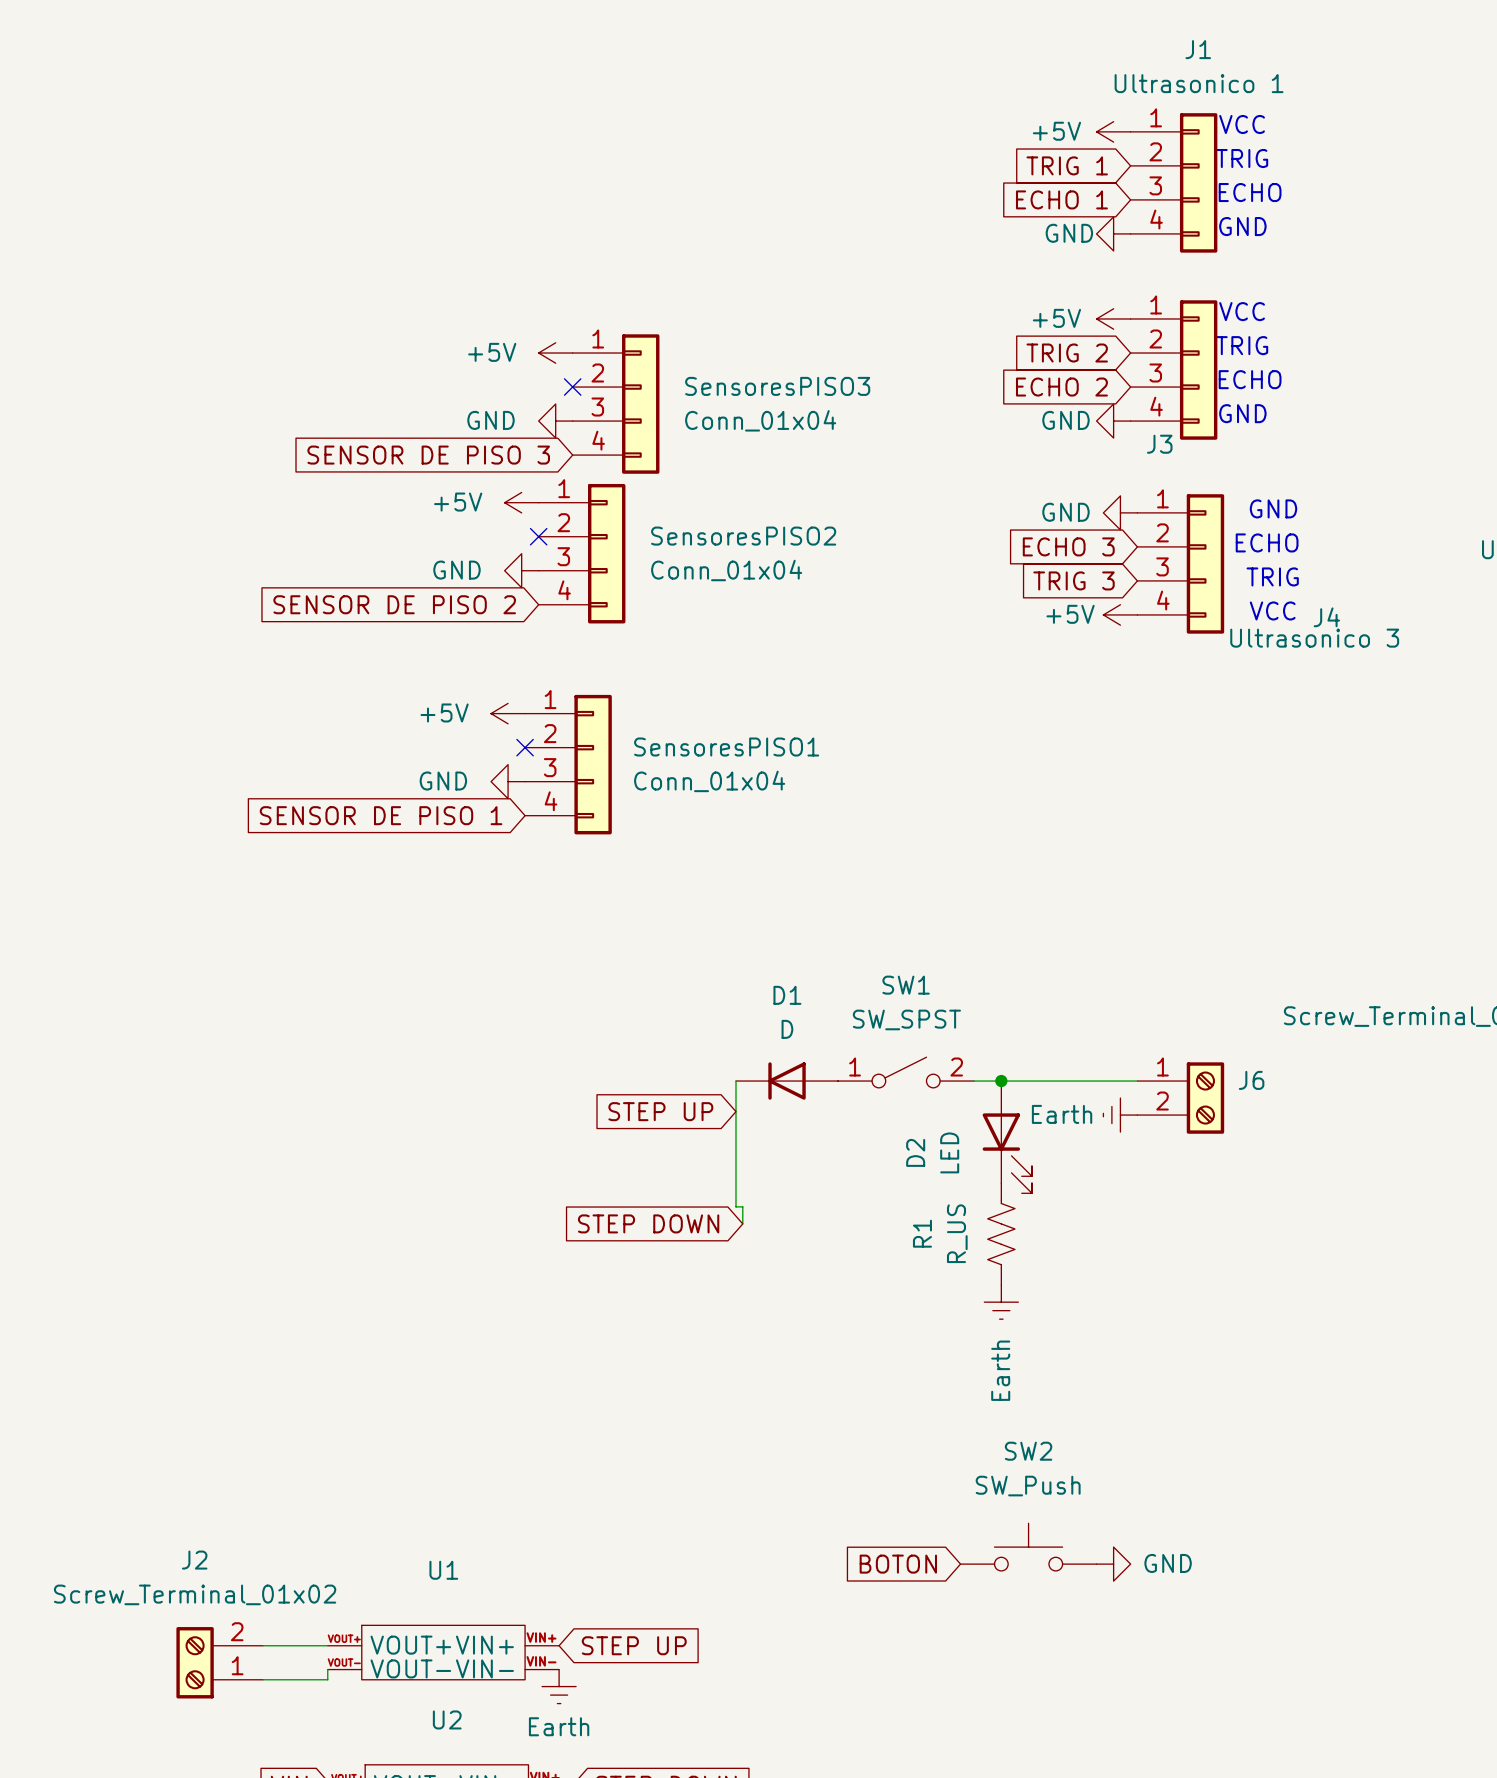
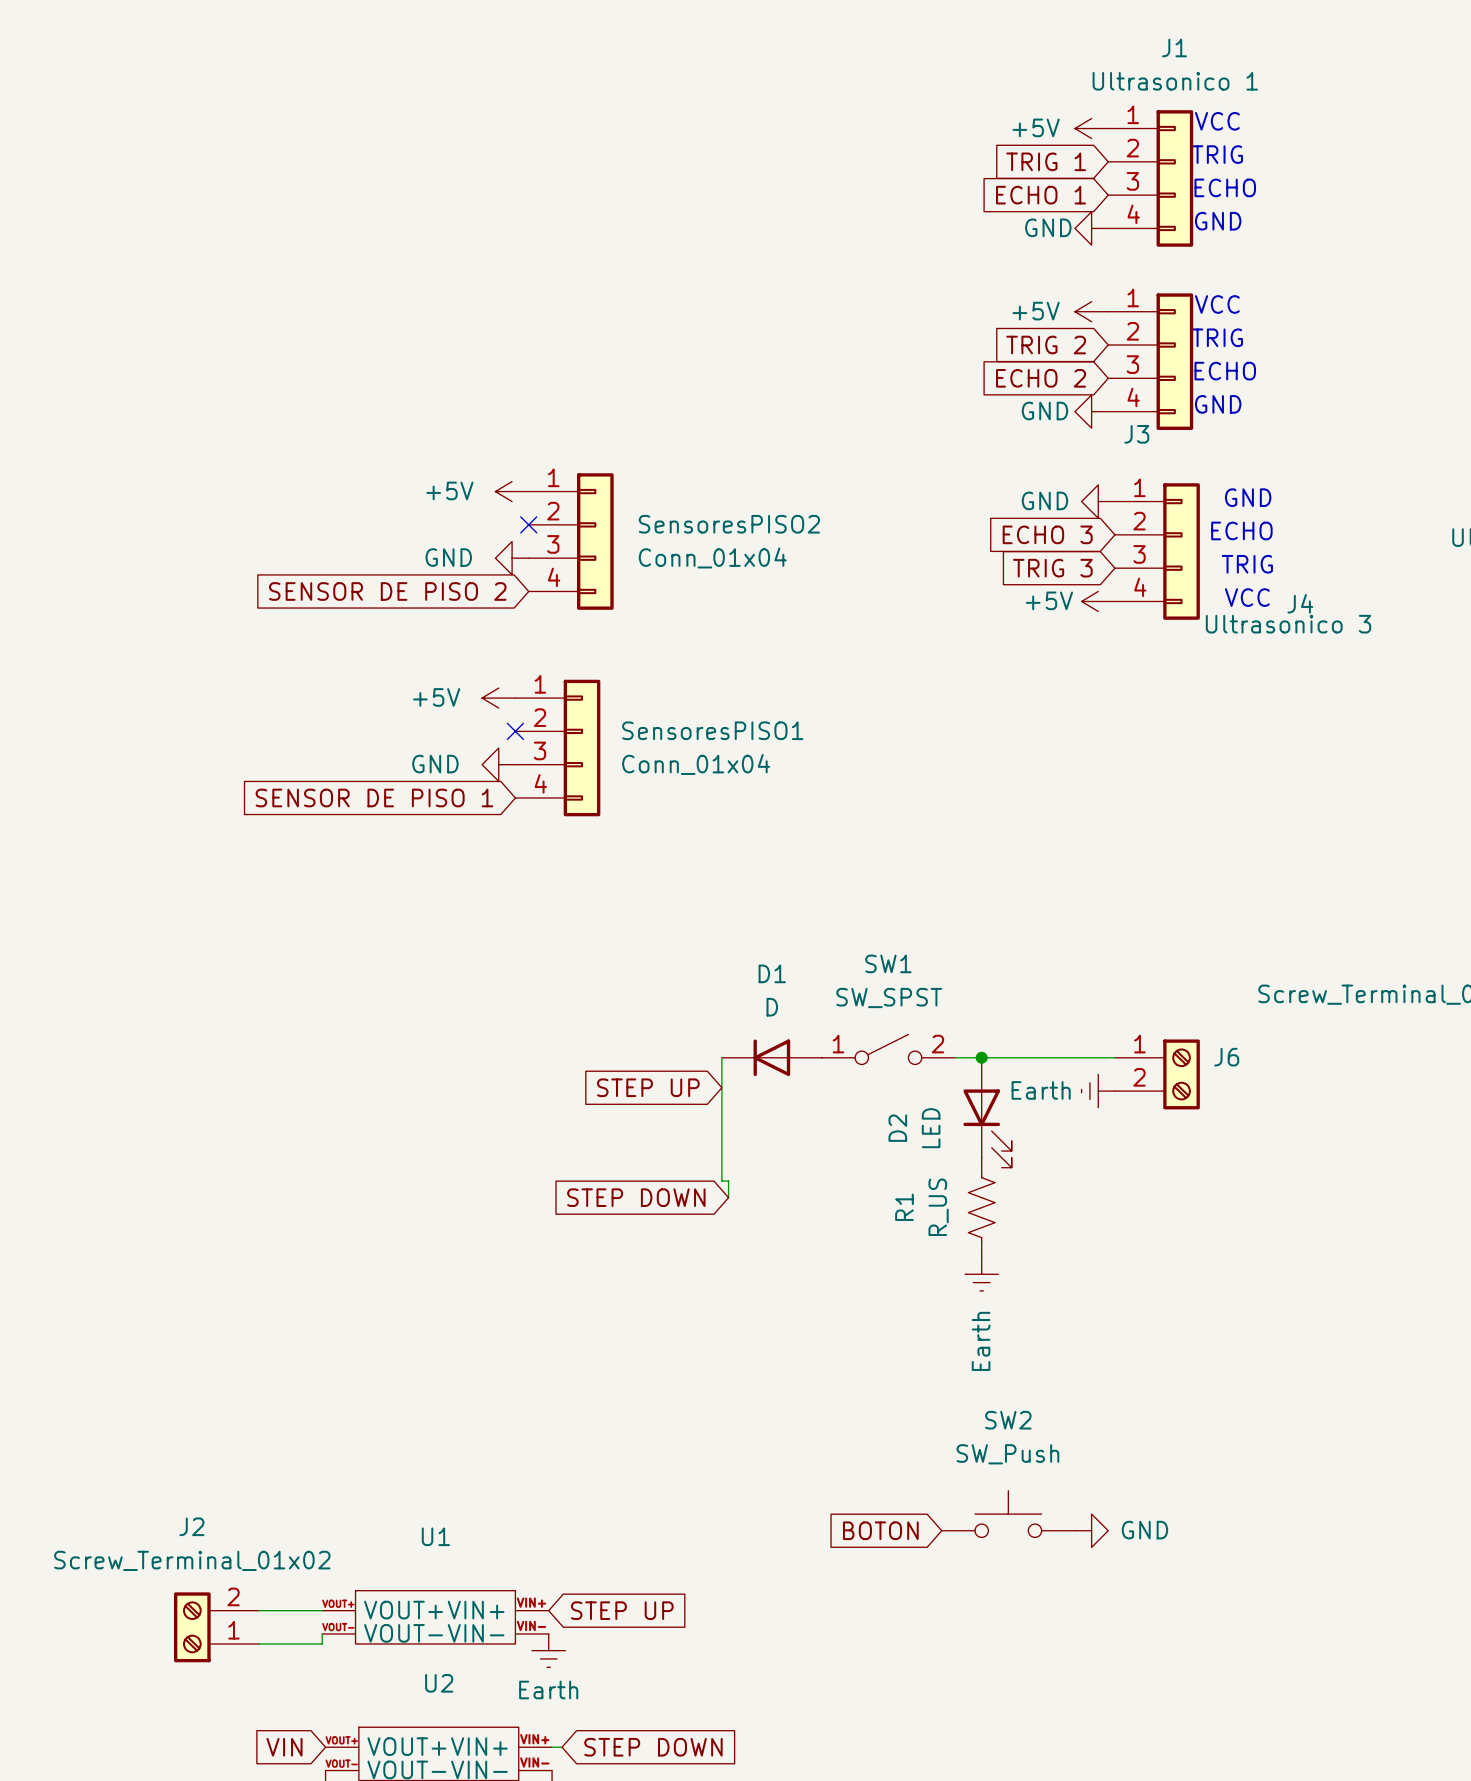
power symbol: +5V (555, 353) -> none
no-connect mark: (572, 387) -> none
SensoresPISO3: Conn_01x04 (616, 404) -> none
power symbol: GND (555, 421) -> none
global label: SENSOR DE PISO 3 (428, 455) -> none

